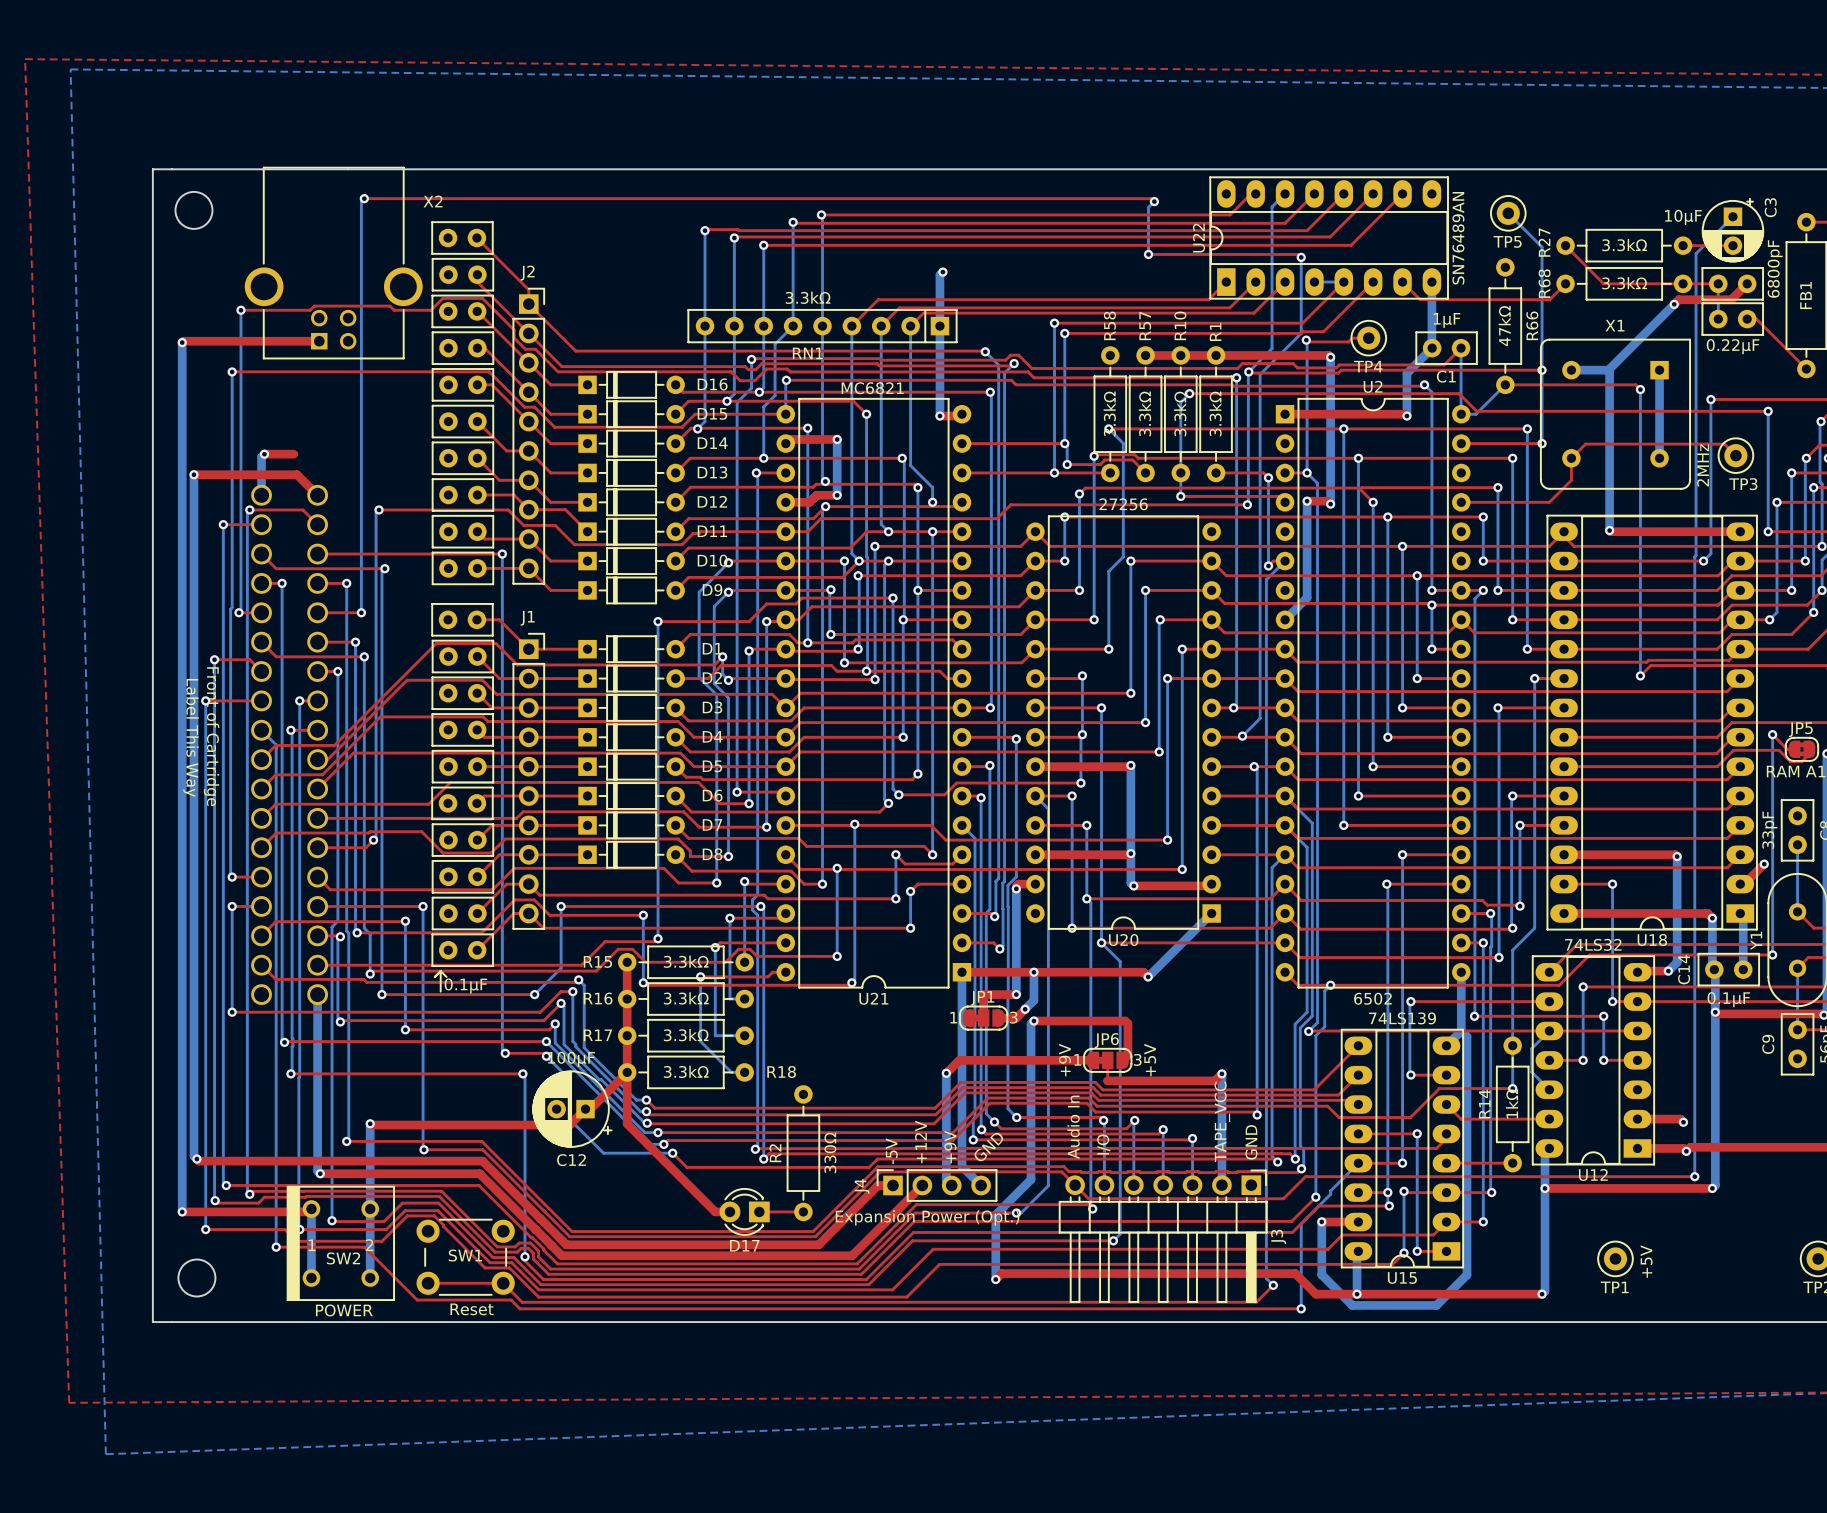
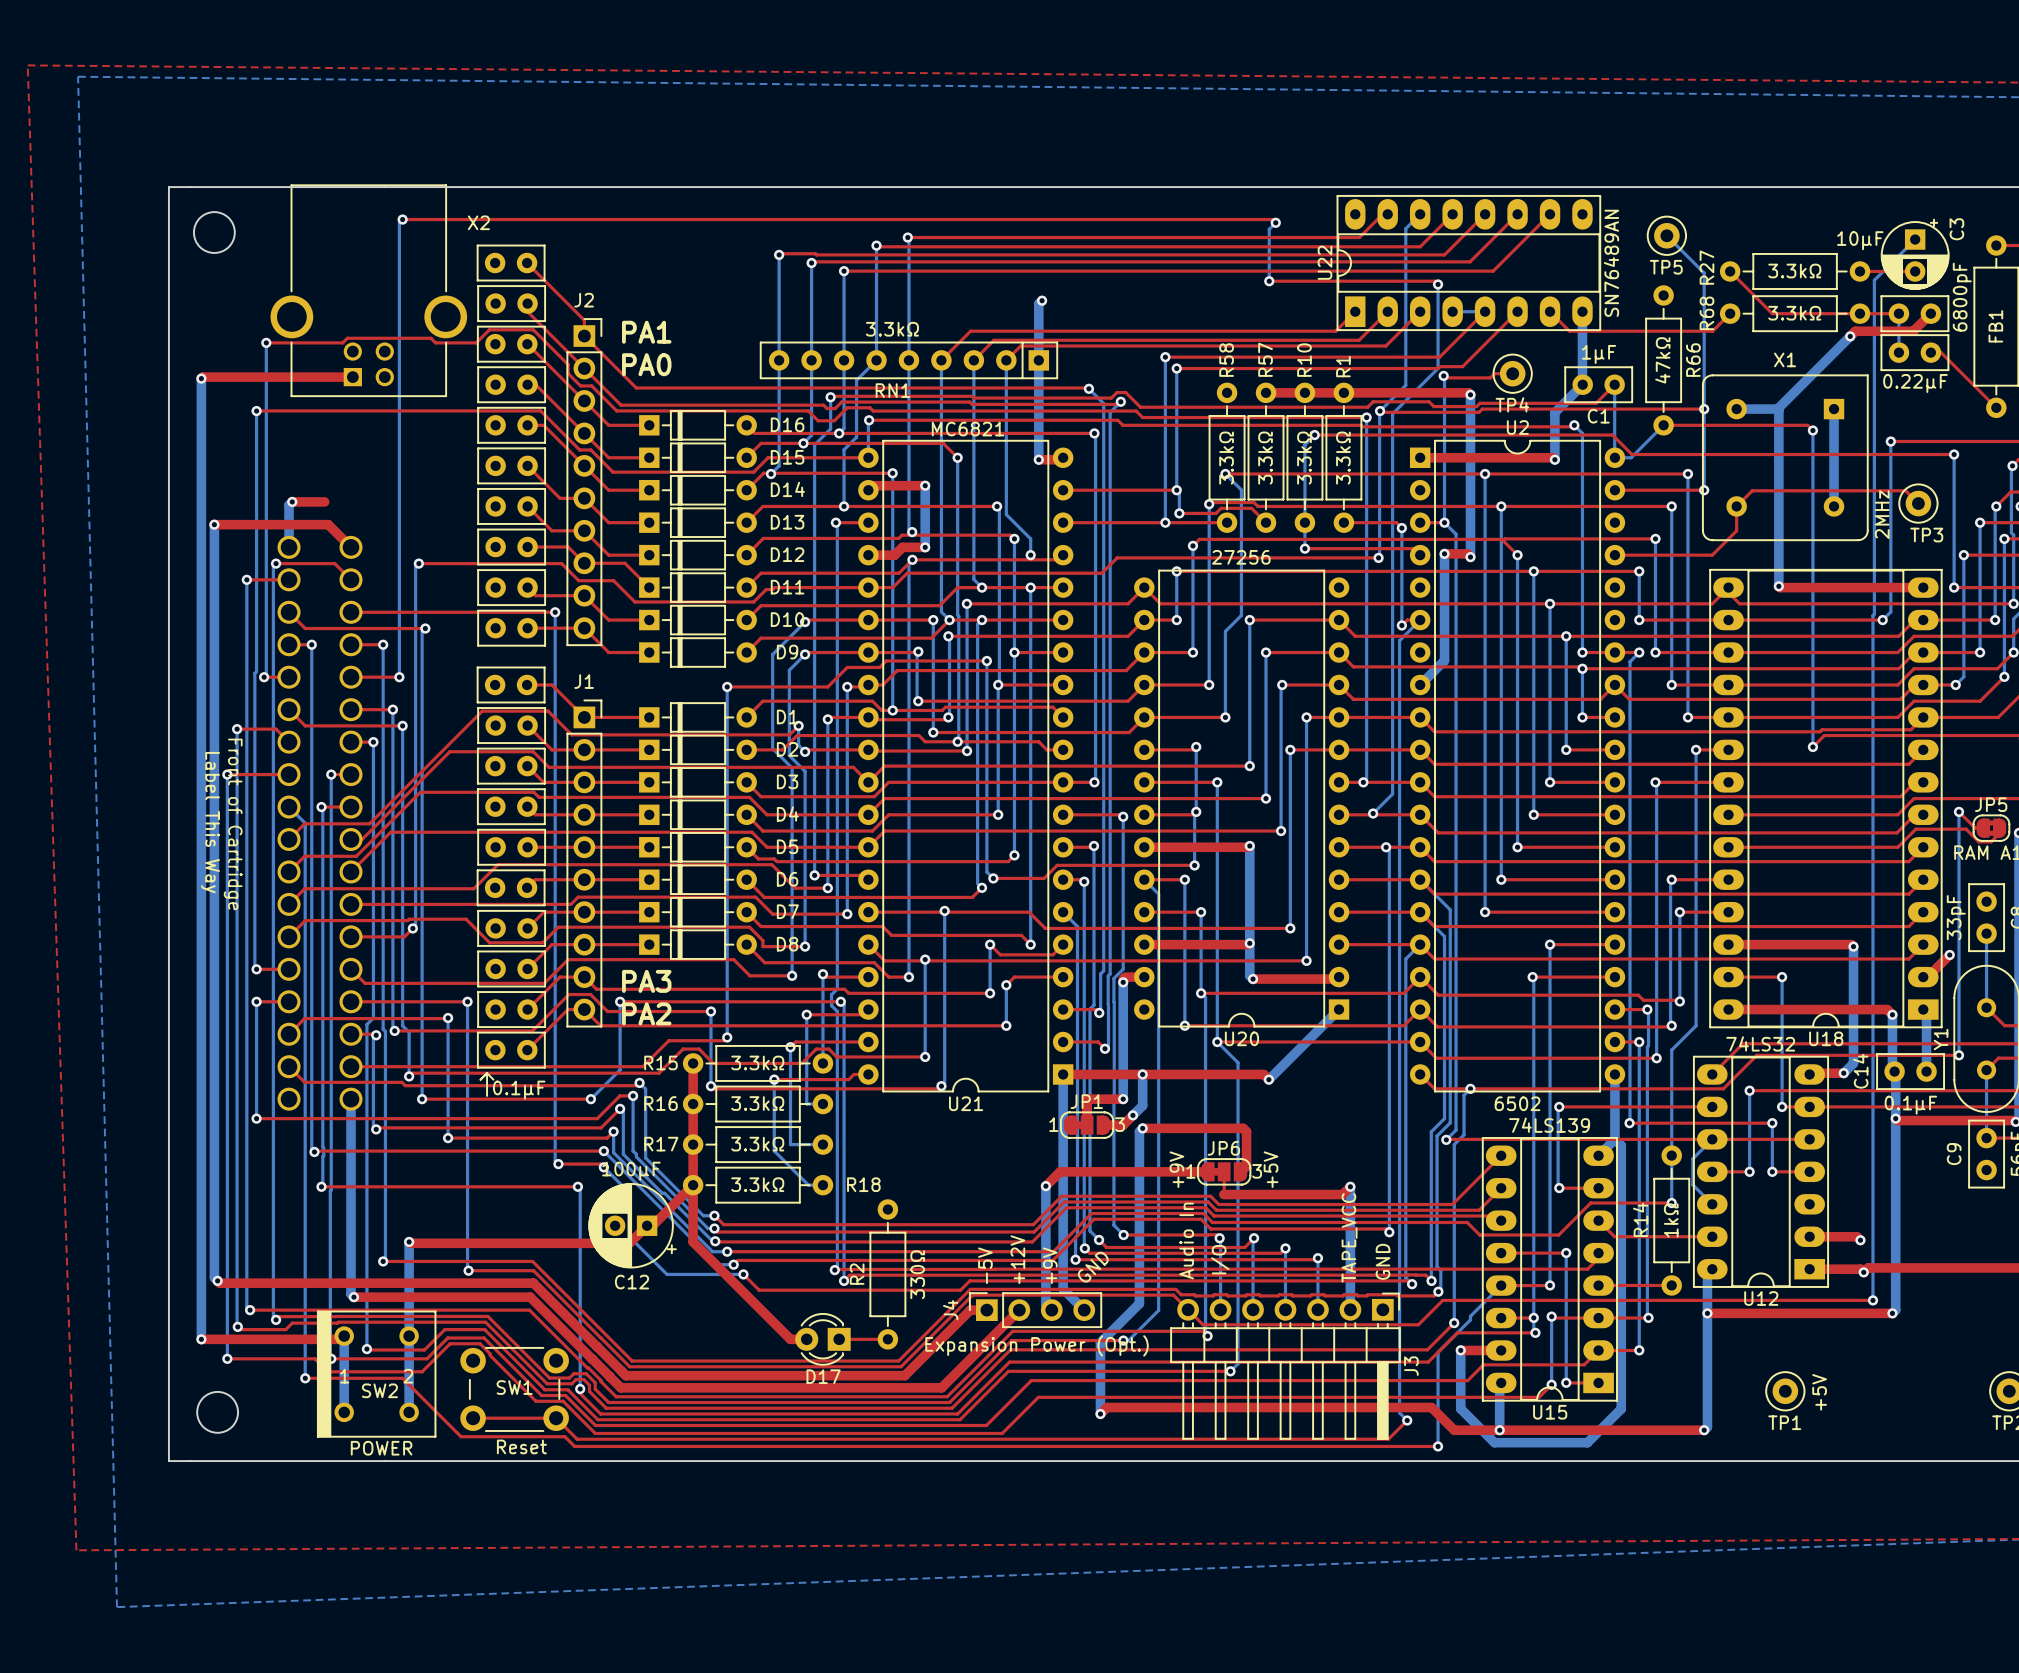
text: none -> PA1 (646, 332)
text: none -> PA0 (646, 364)
text: none -> PA3 (646, 981)
text: none -> PA2 (646, 1013)

